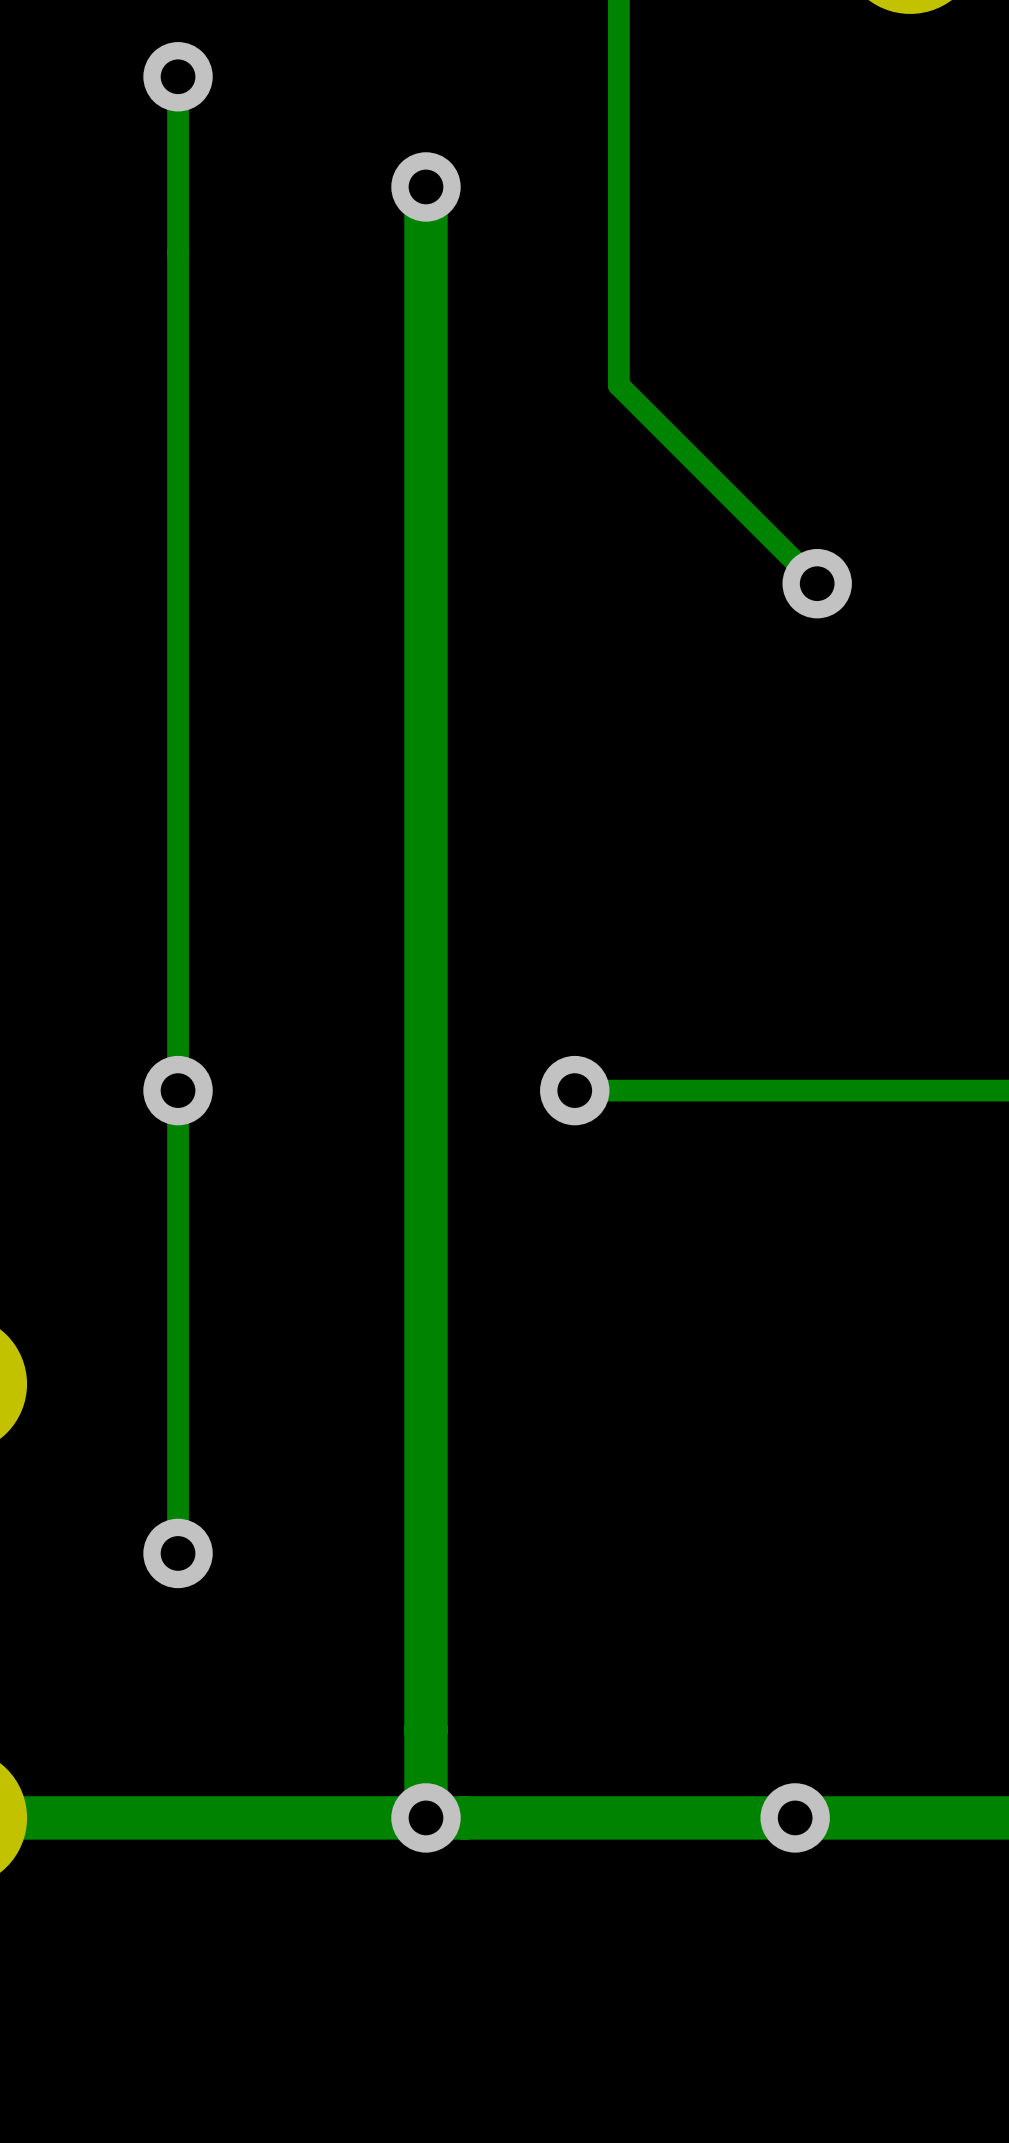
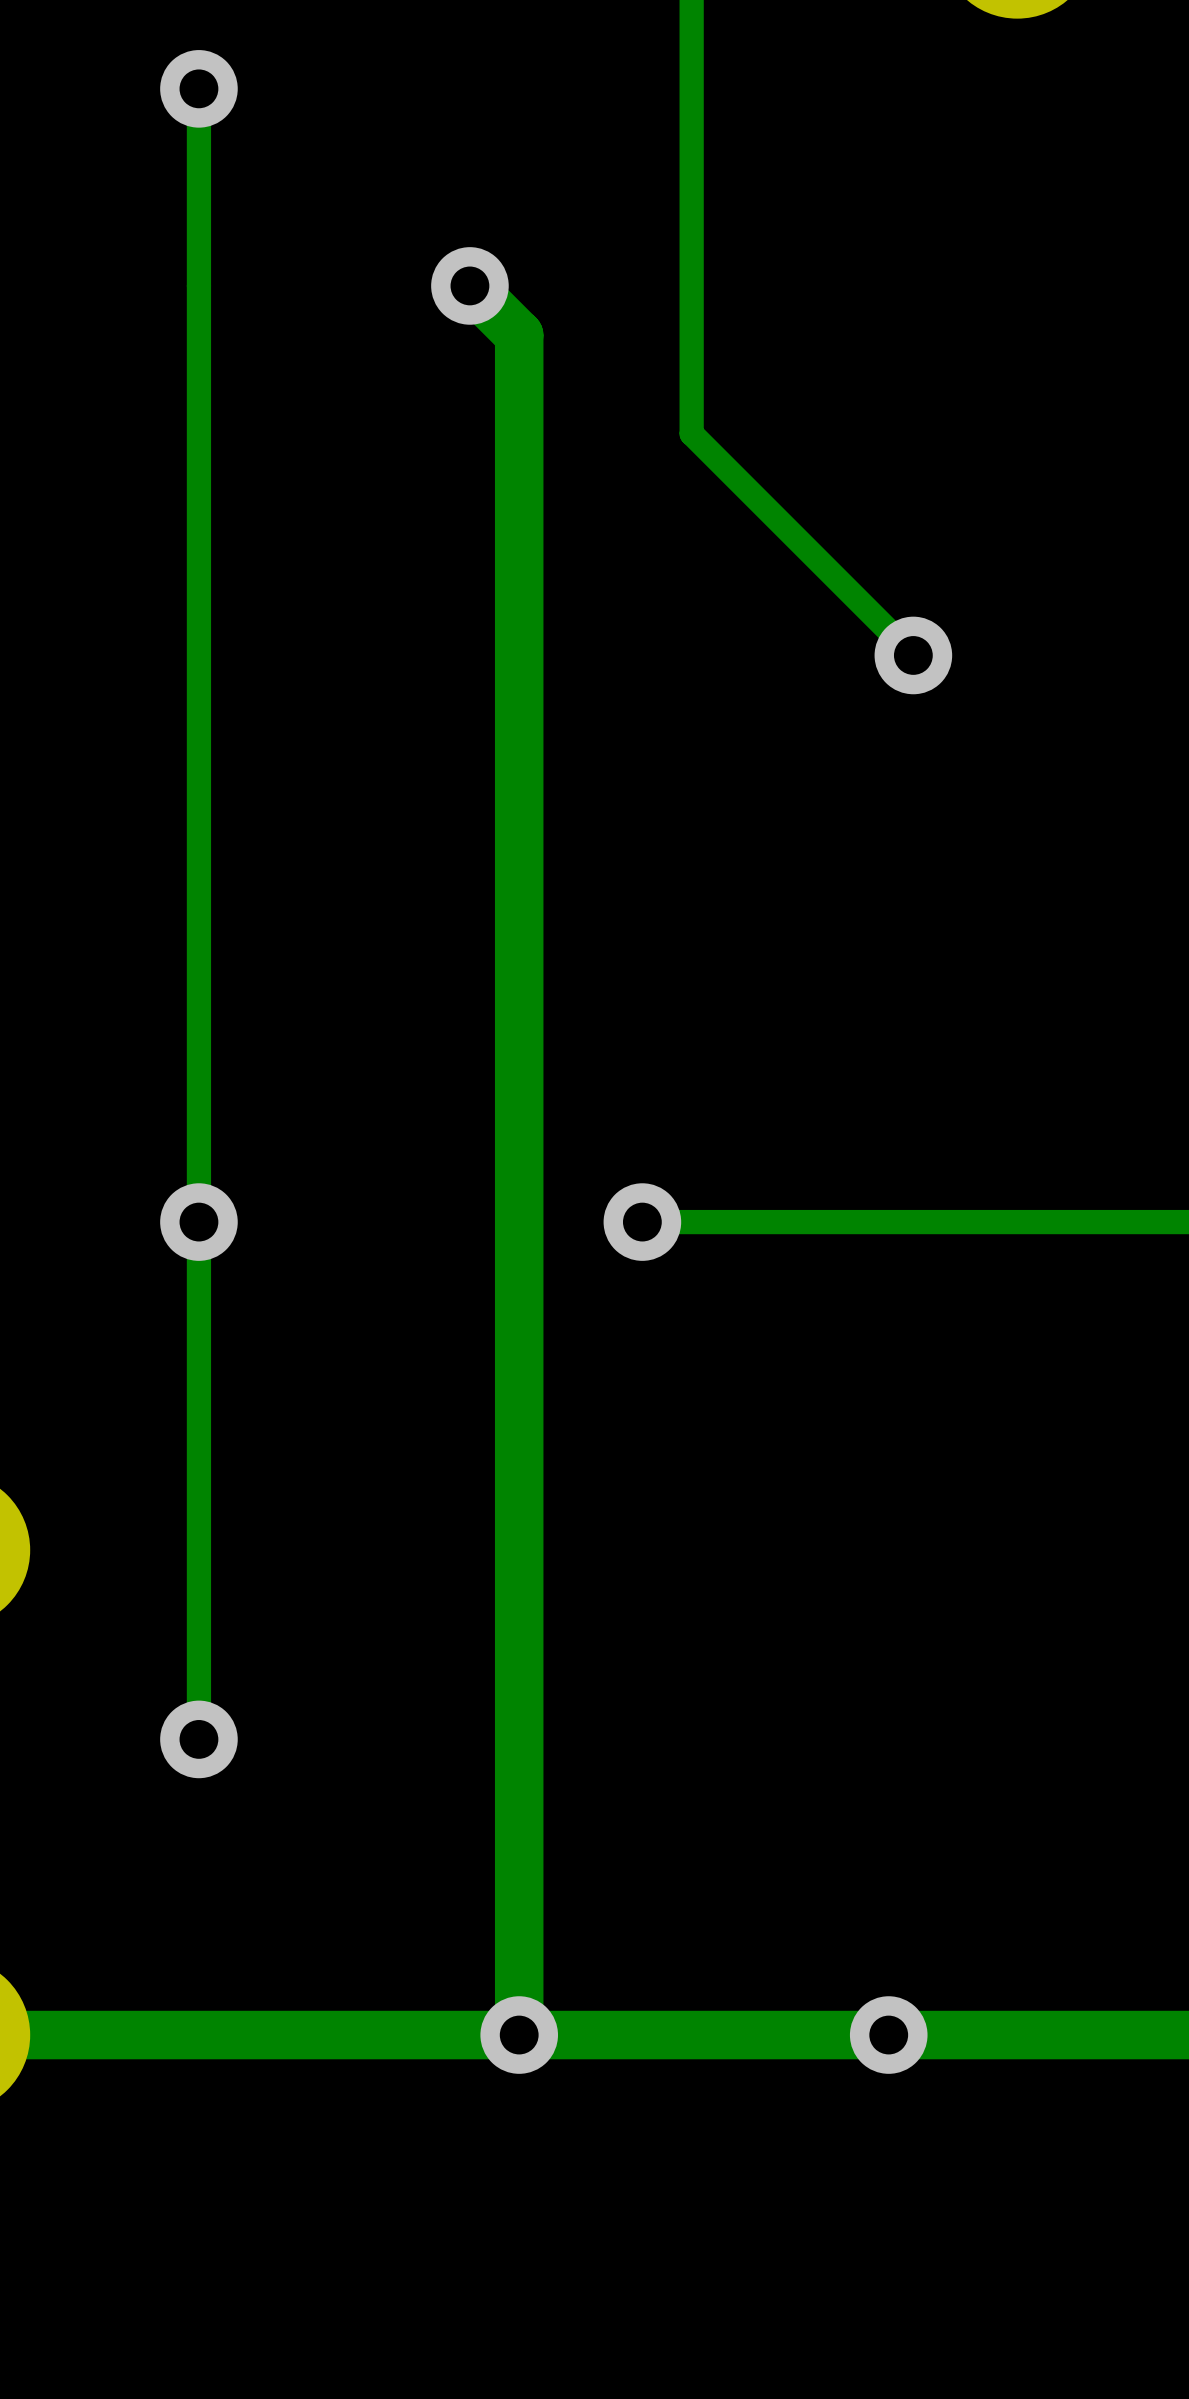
track: (425, 186) (425, 1817) -> none
via position: (425, 186) -> (469, 285)
track: none -> (469, 285) (519, 335) (519, 2035)
via position: (425, 1817) -> (519, 2035)

